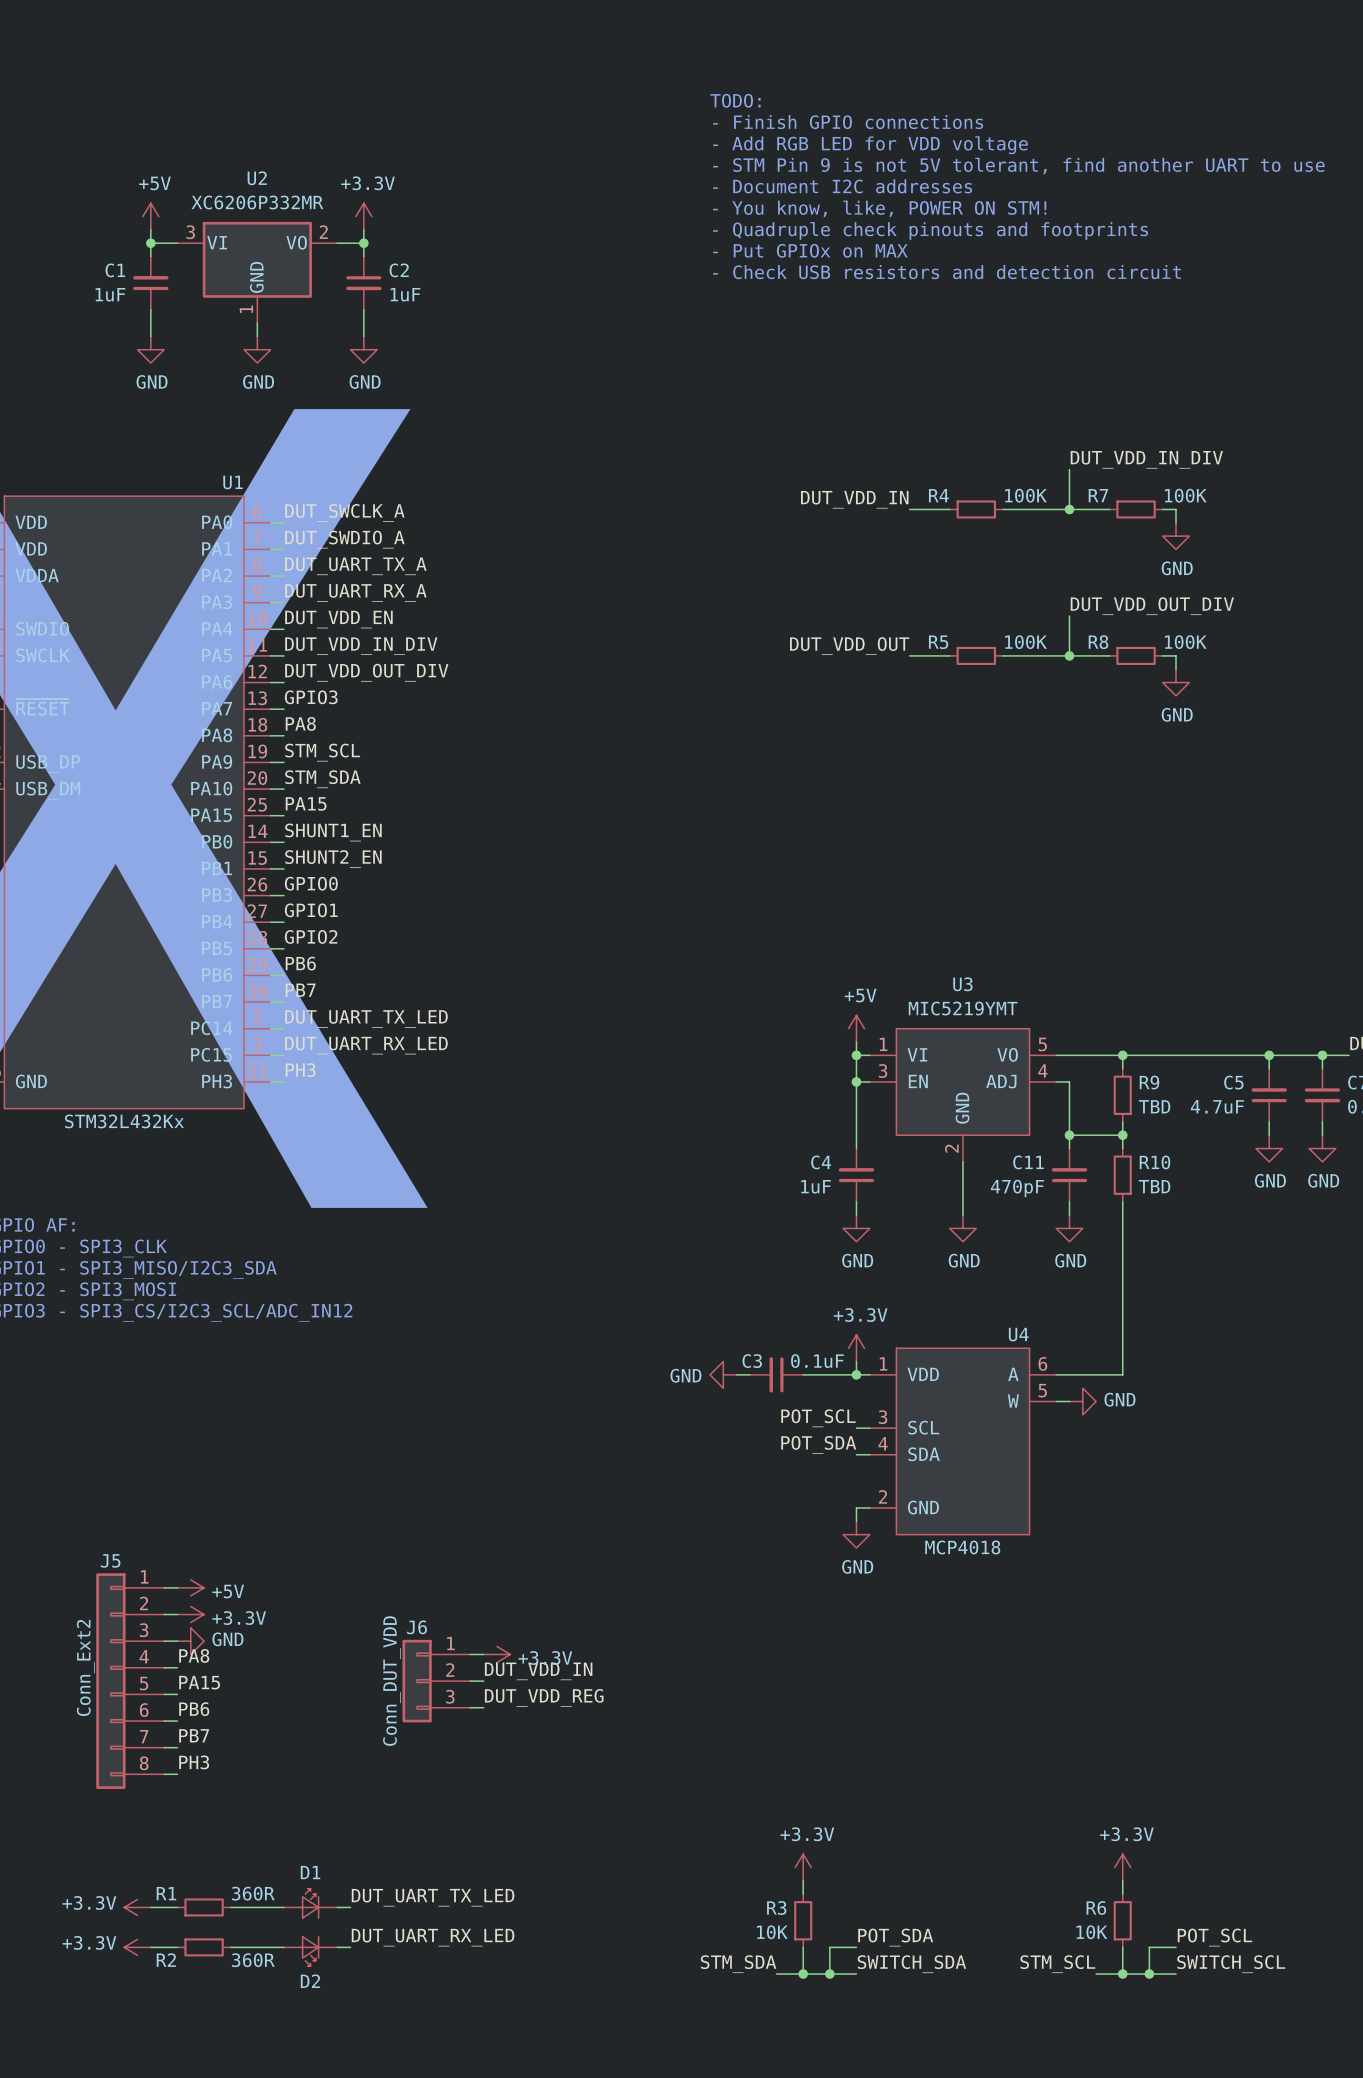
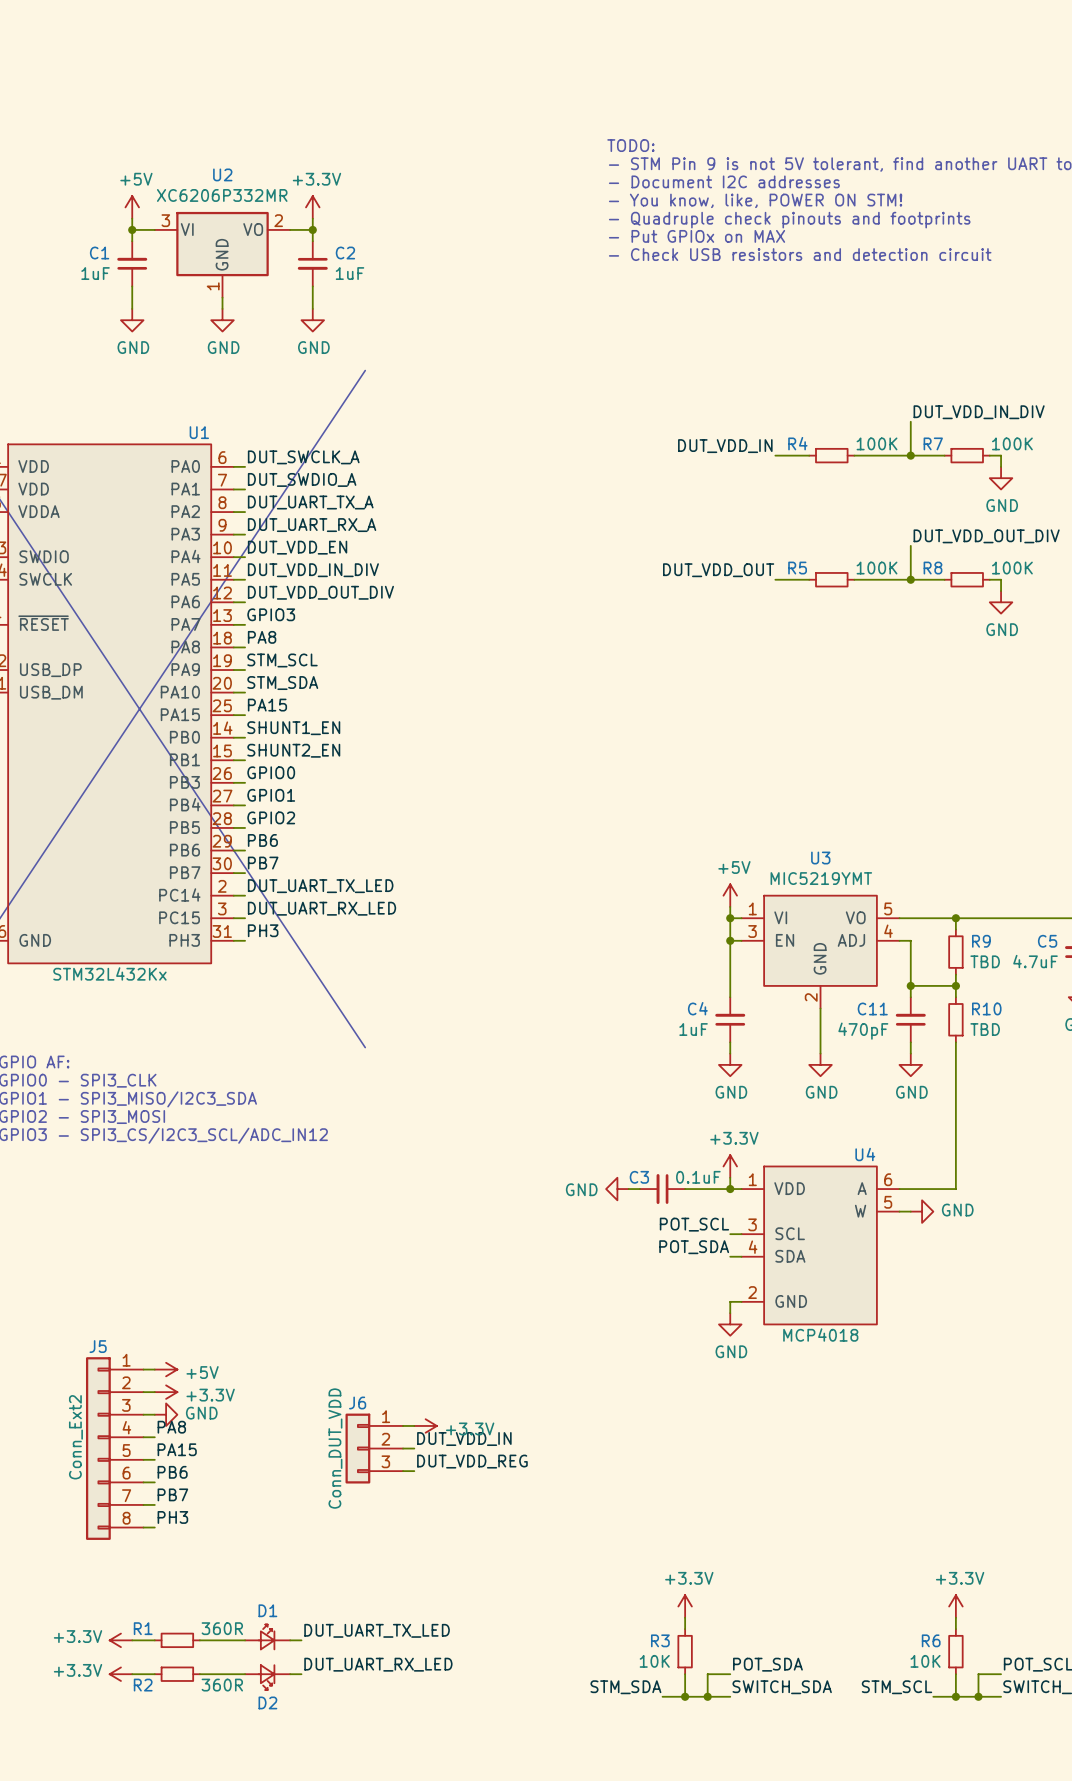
text: TODO: (735, 100) -> none
text: - Finish GPIO connections (848, 122) -> none
text: - Add RGB LED for VDD voltage (870, 145) -> TODO: (630, 145)

